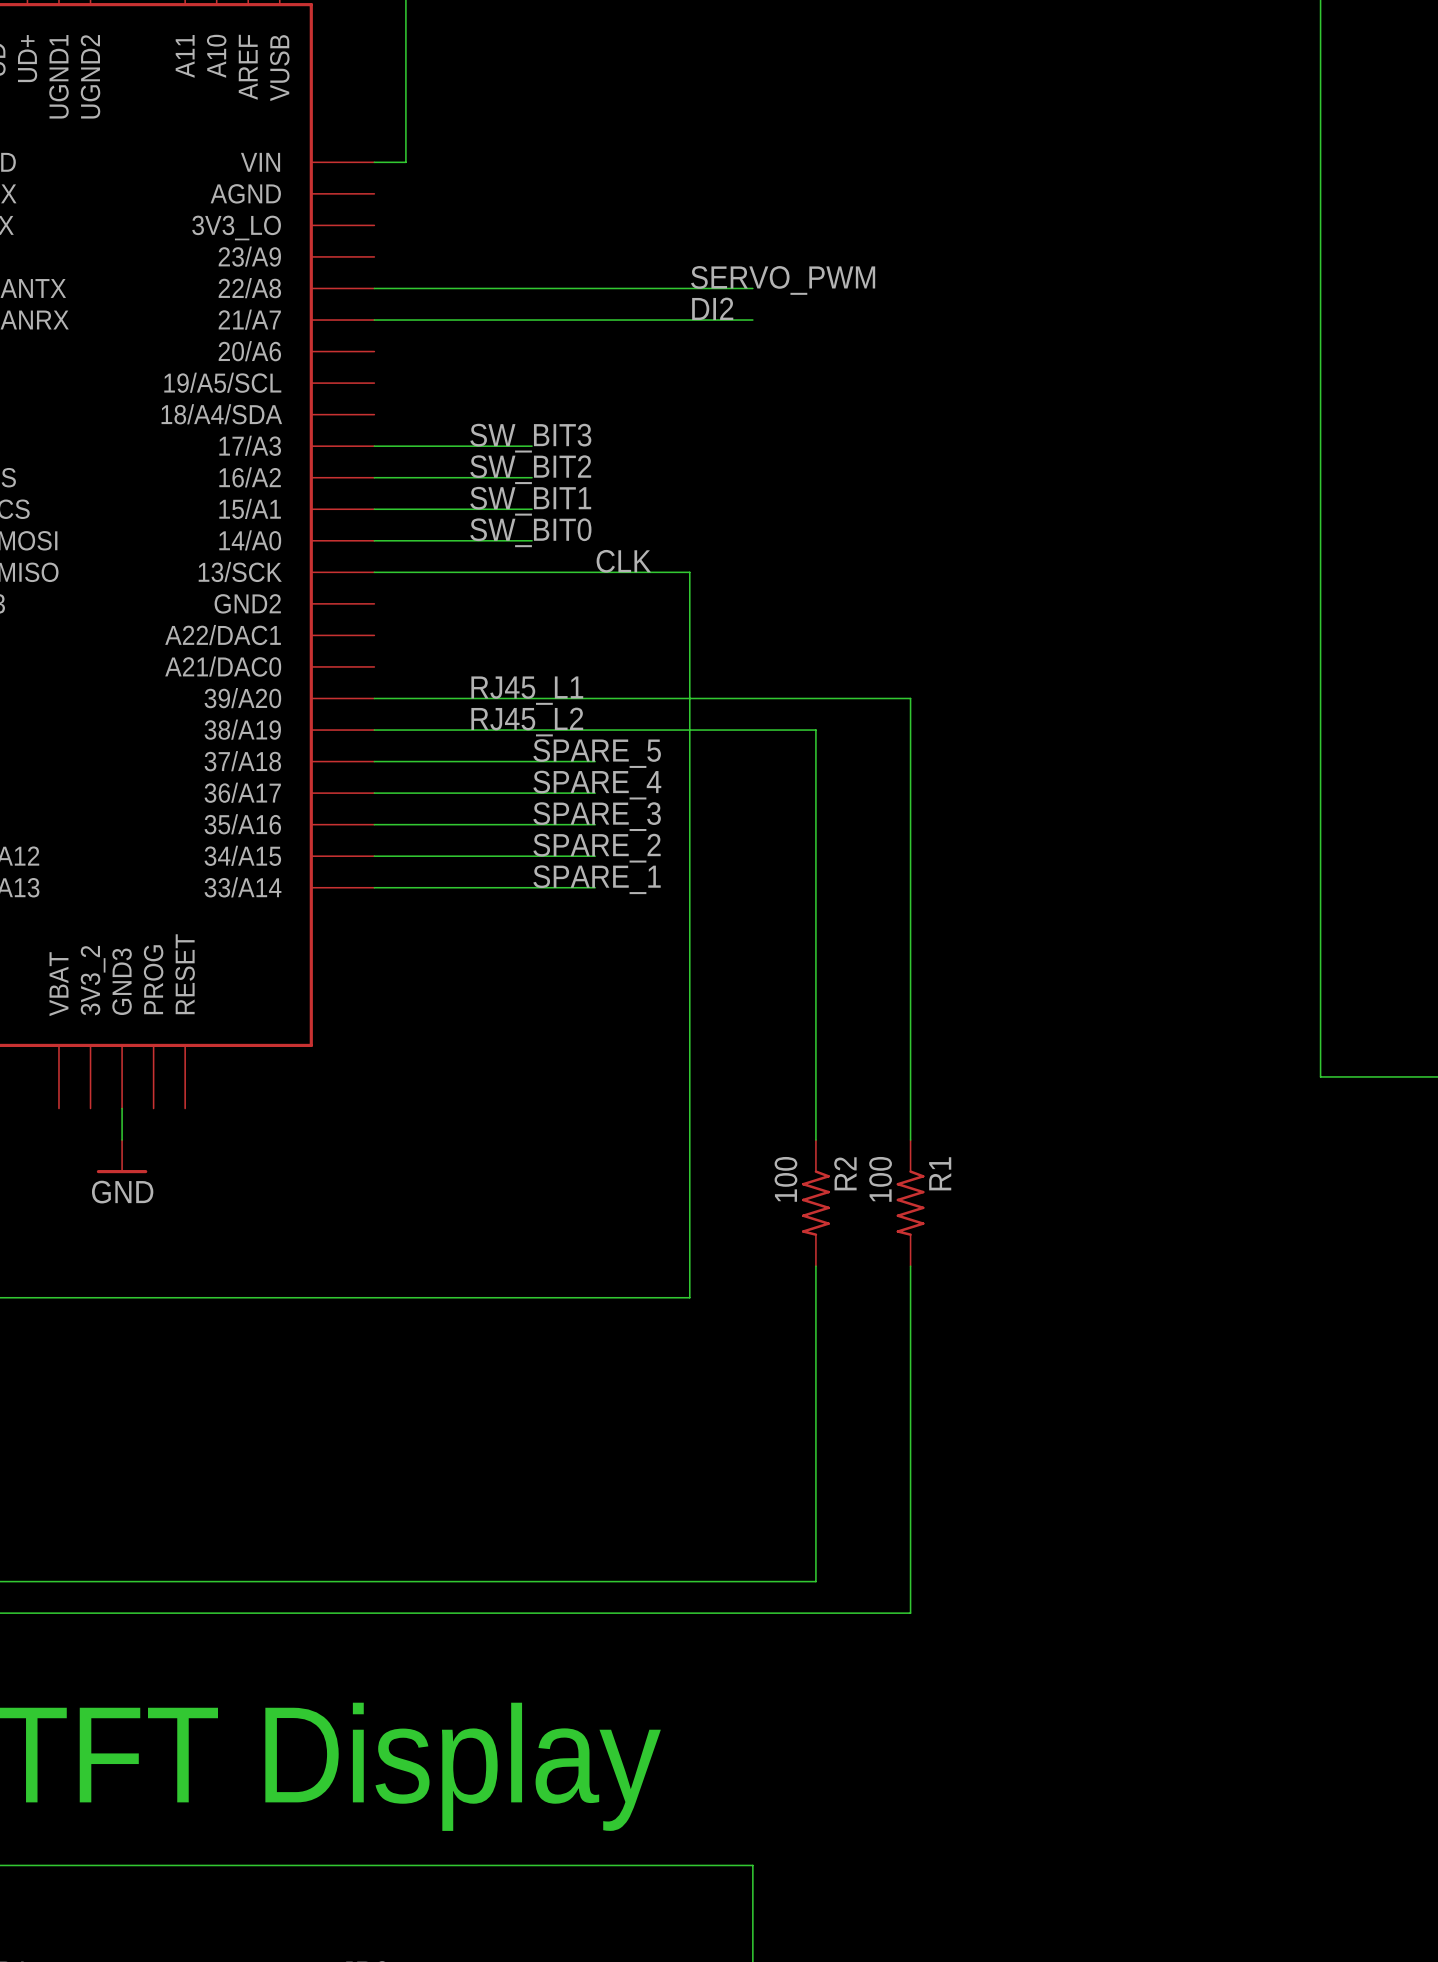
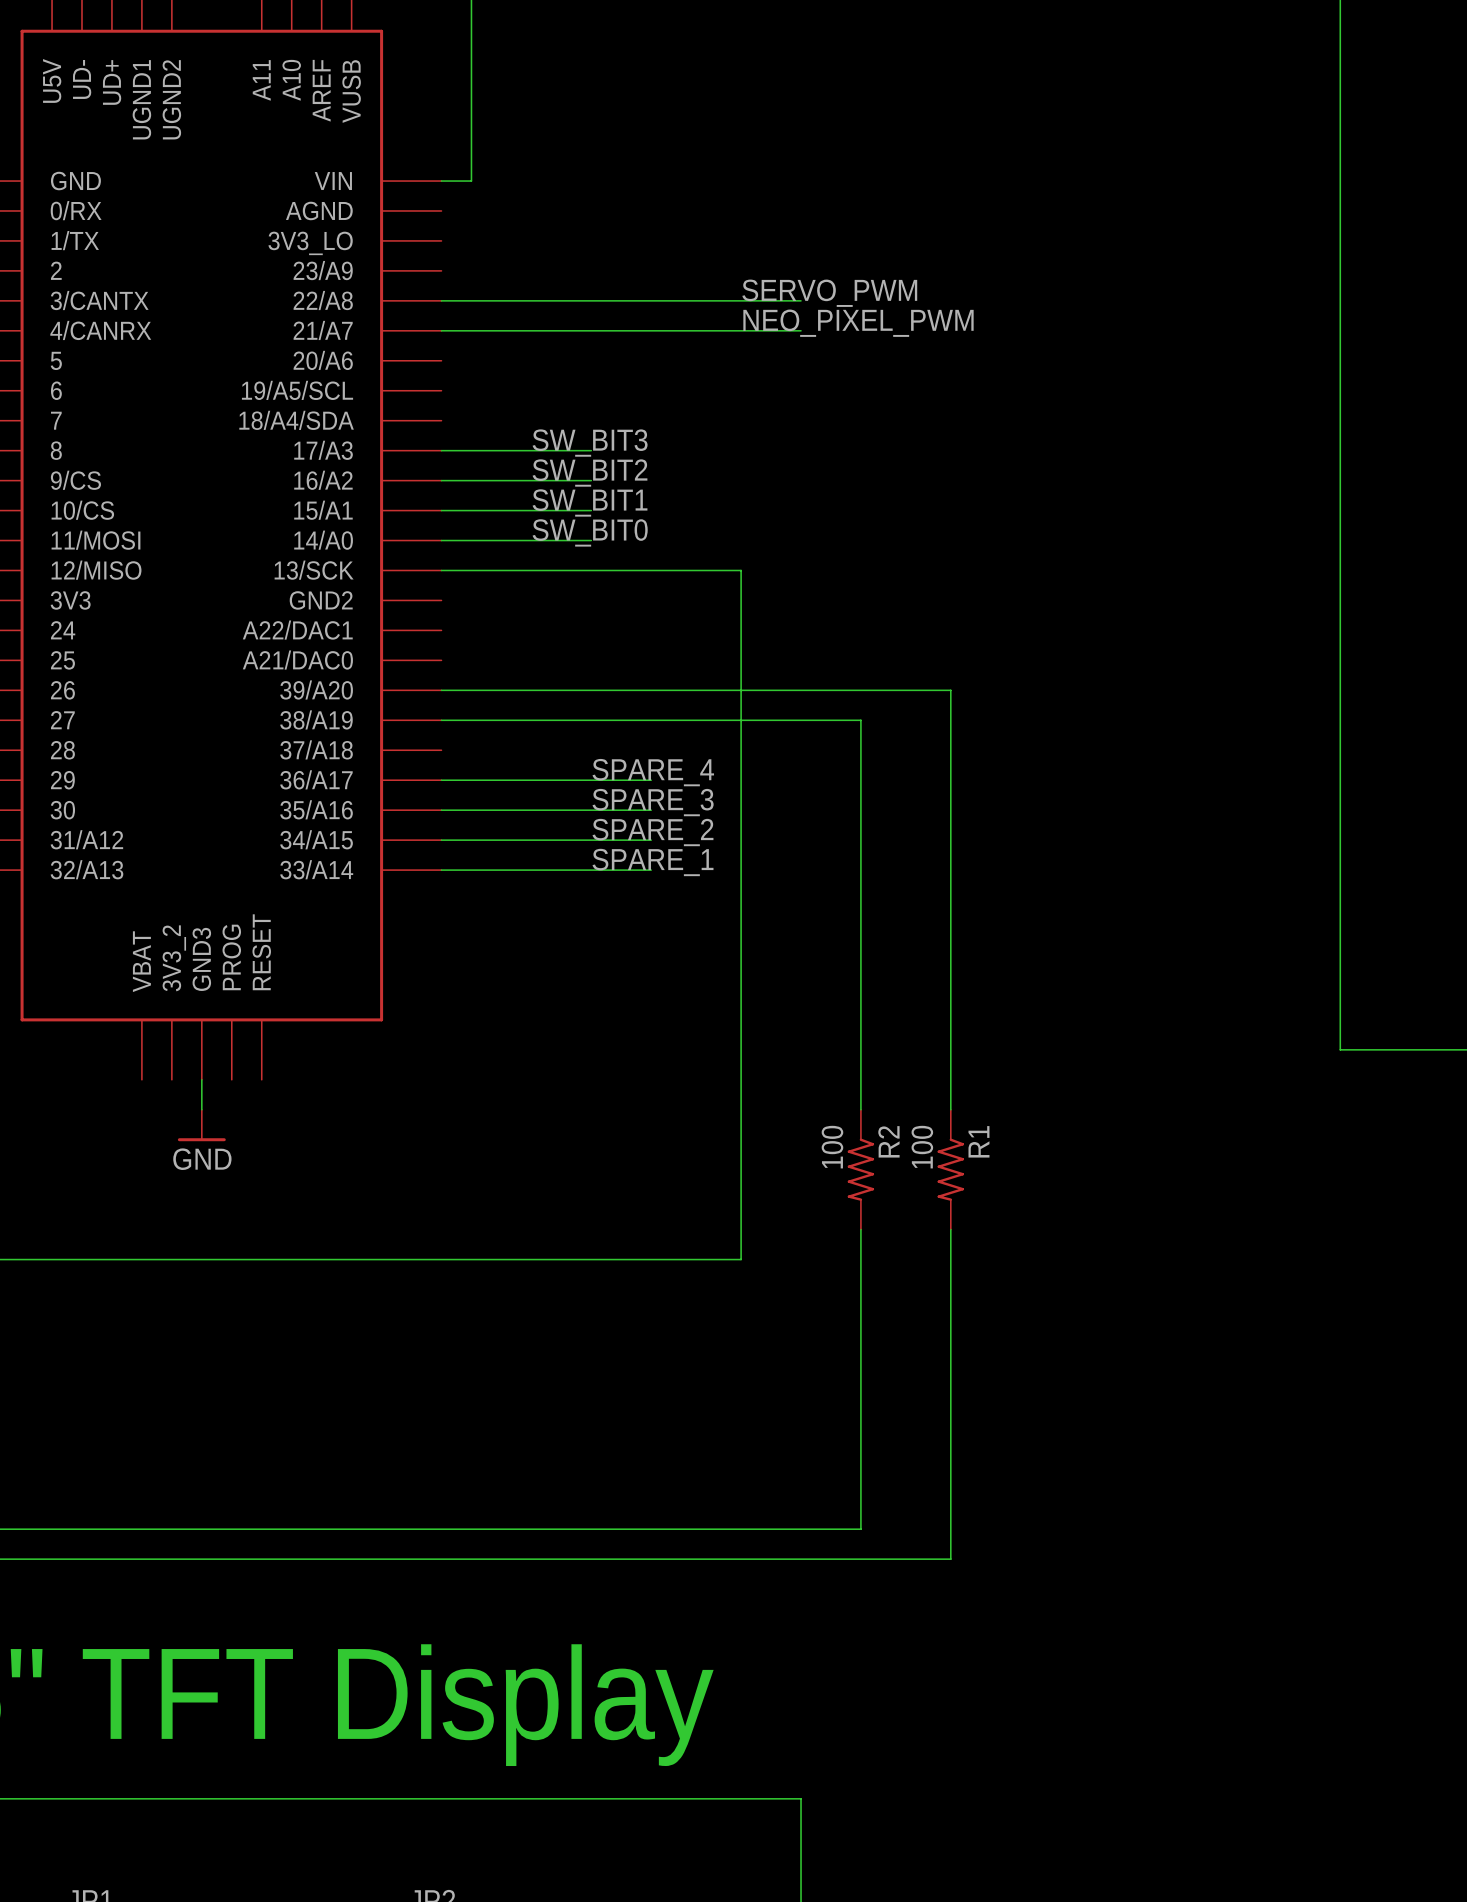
label: DI2 (712, 308) -> NEO_PIXEL_PWM (858, 323)
label: CLK (623, 561) -> none
label: RJ45_L1 (527, 690) -> none
label: RJ45_L2 (527, 722) -> none
label: SPARE_5 (597, 753) -> none
wire: (374, 761) (595, 761) -> none

